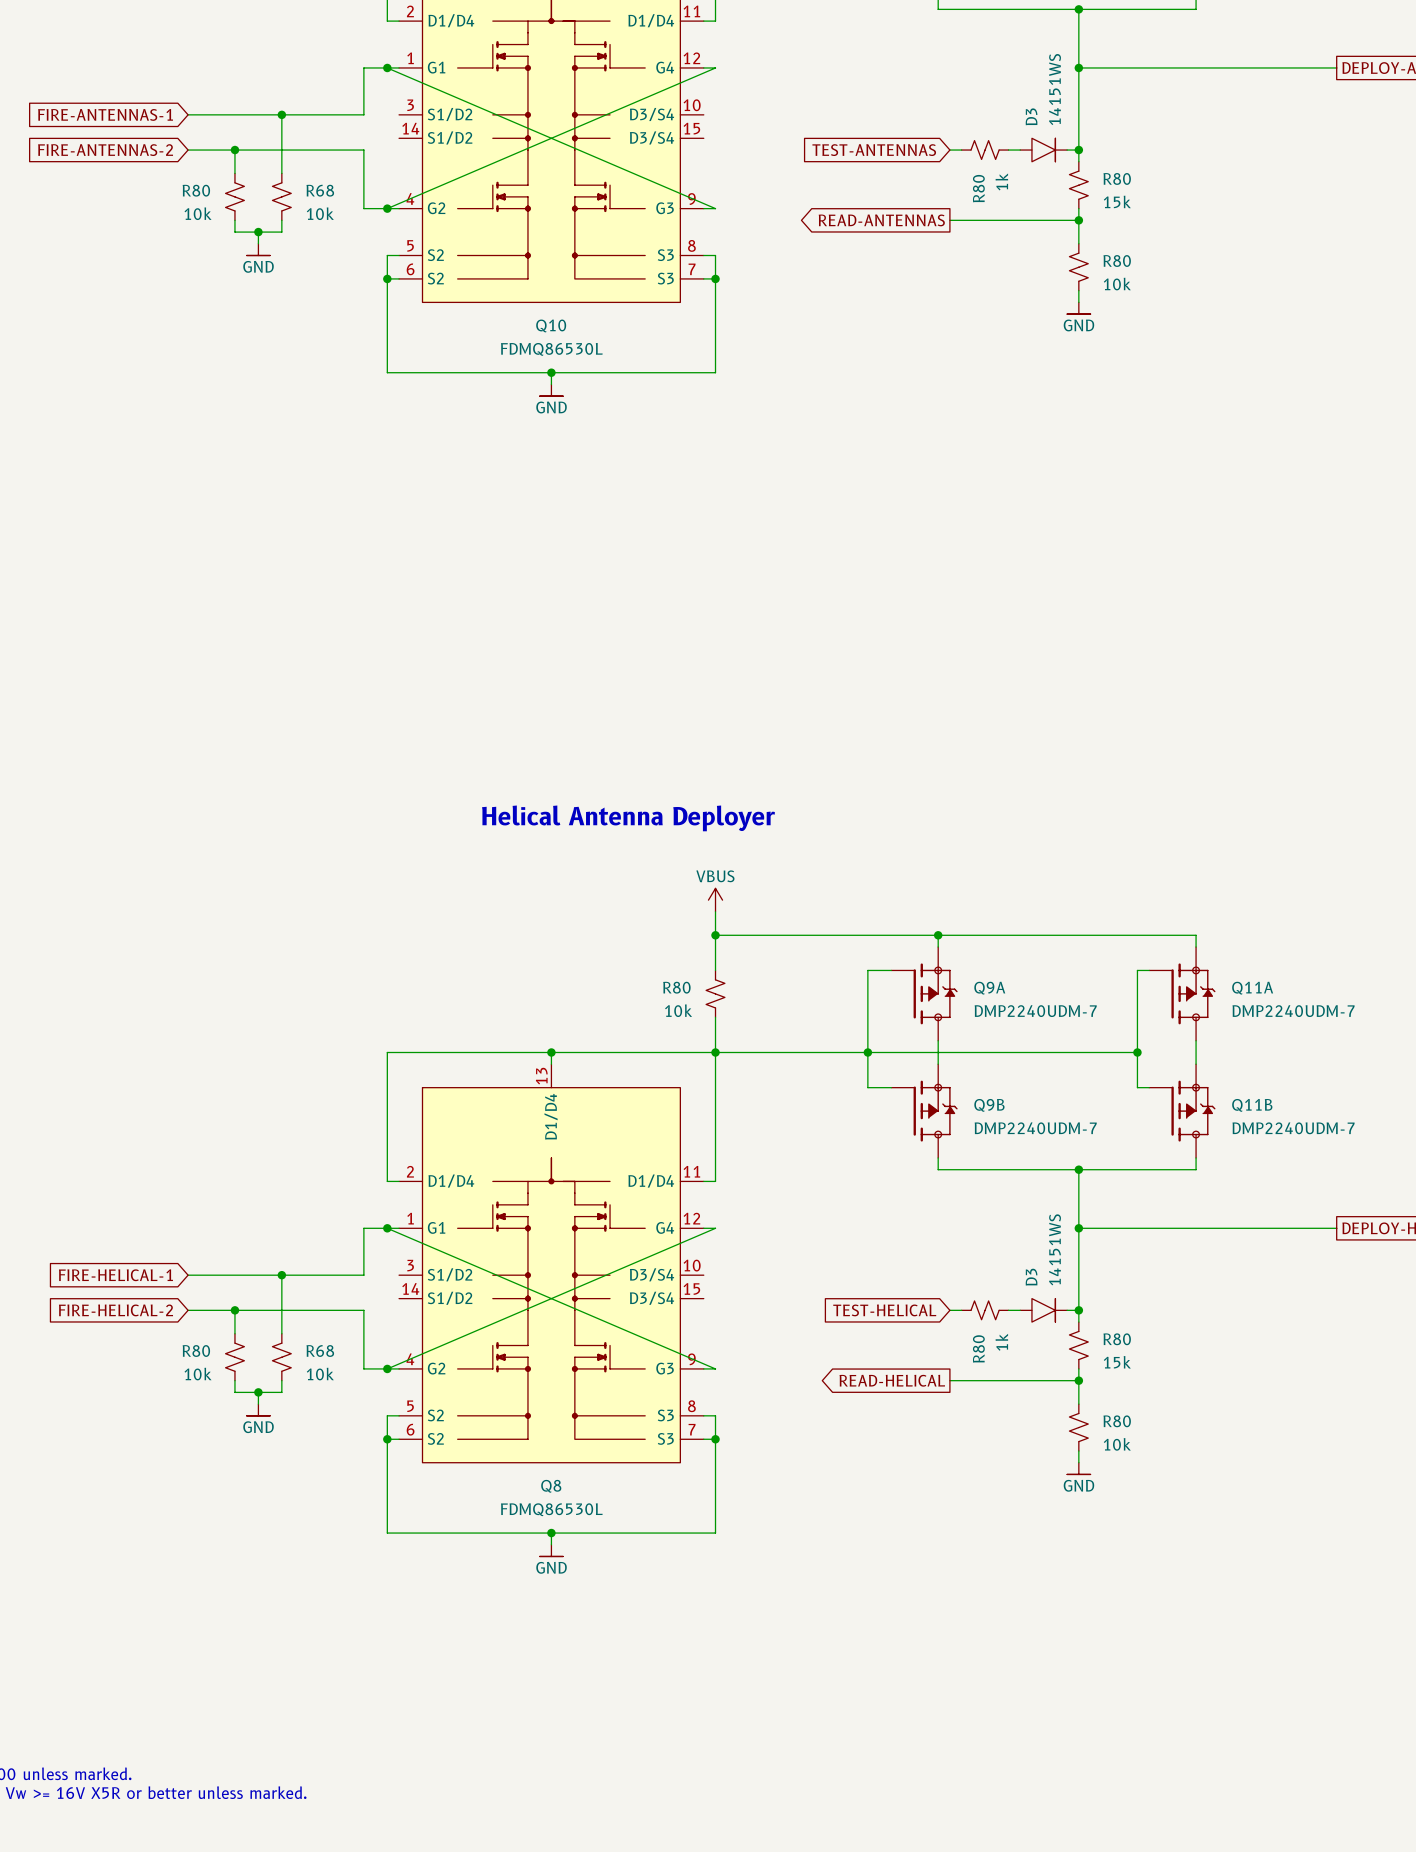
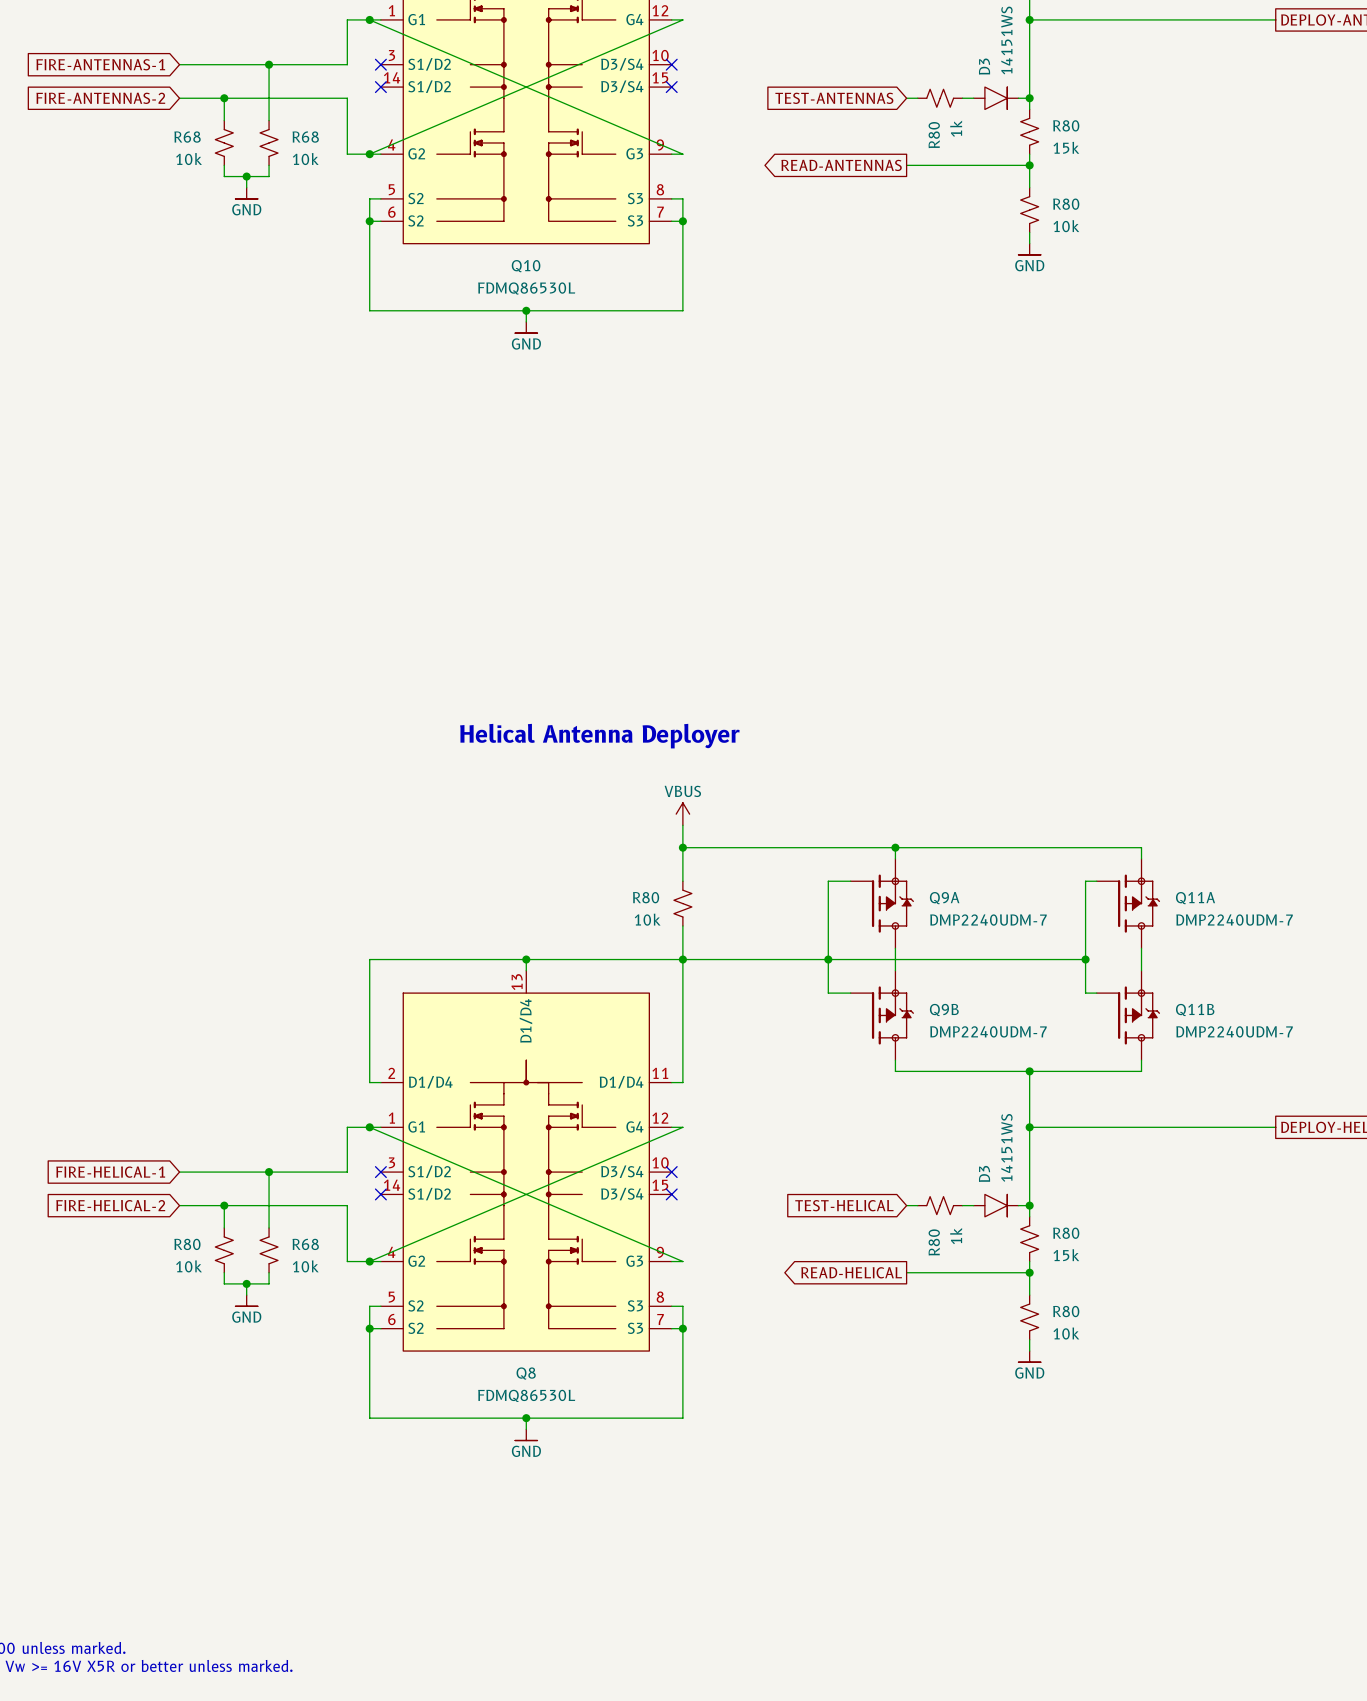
no-connect mark: none -> (380, 64)
no-connect mark: none -> (671, 64)
no-connect mark: none -> (380, 87)
no-connect mark: none -> (671, 87)
R80 name: R80 (196, 190) -> R68 (187, 137)
no-connect mark: none -> (380, 1172)
no-connect mark: none -> (671, 1172)
no-connect mark: none -> (380, 1194)
no-connect mark: none -> (671, 1194)

